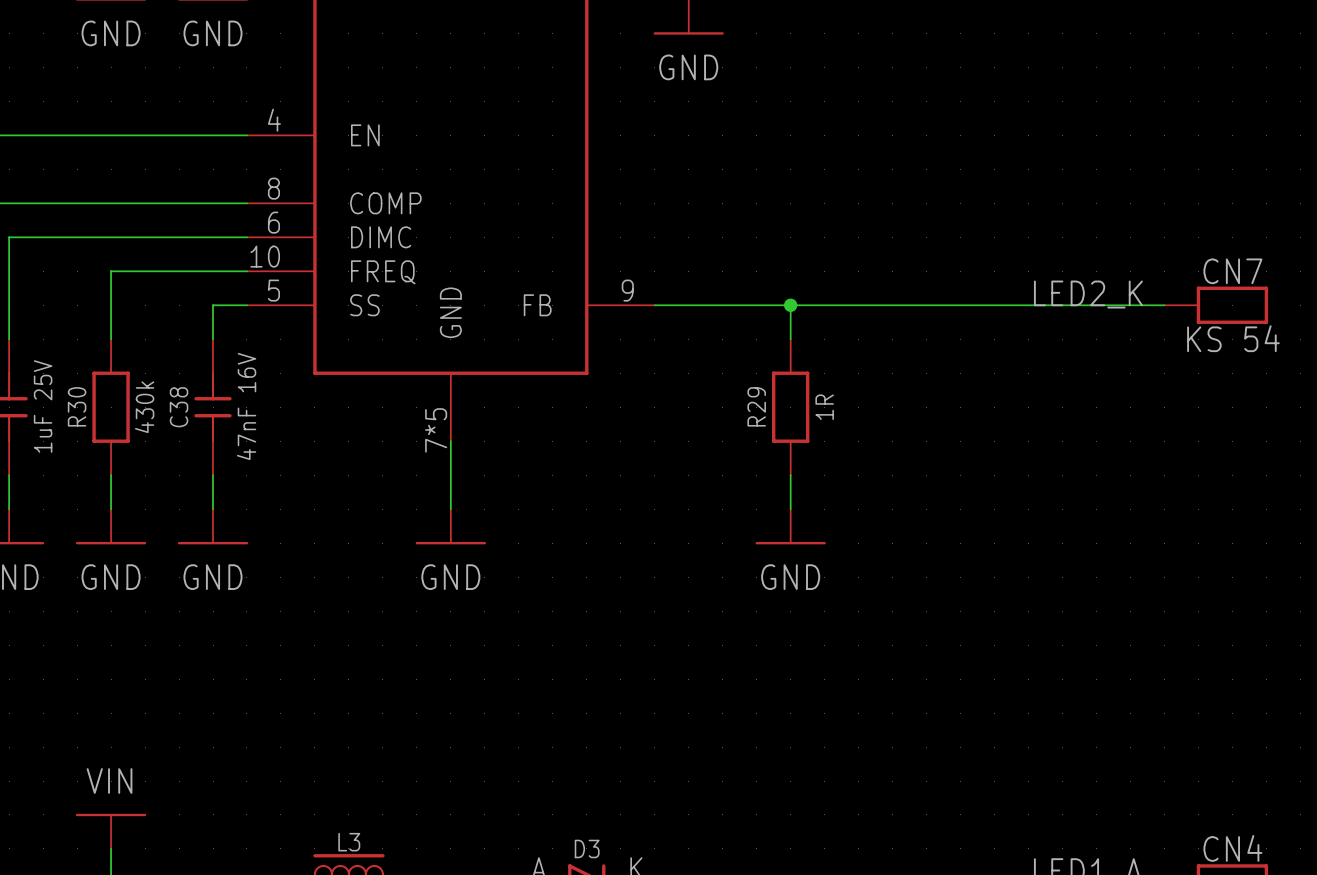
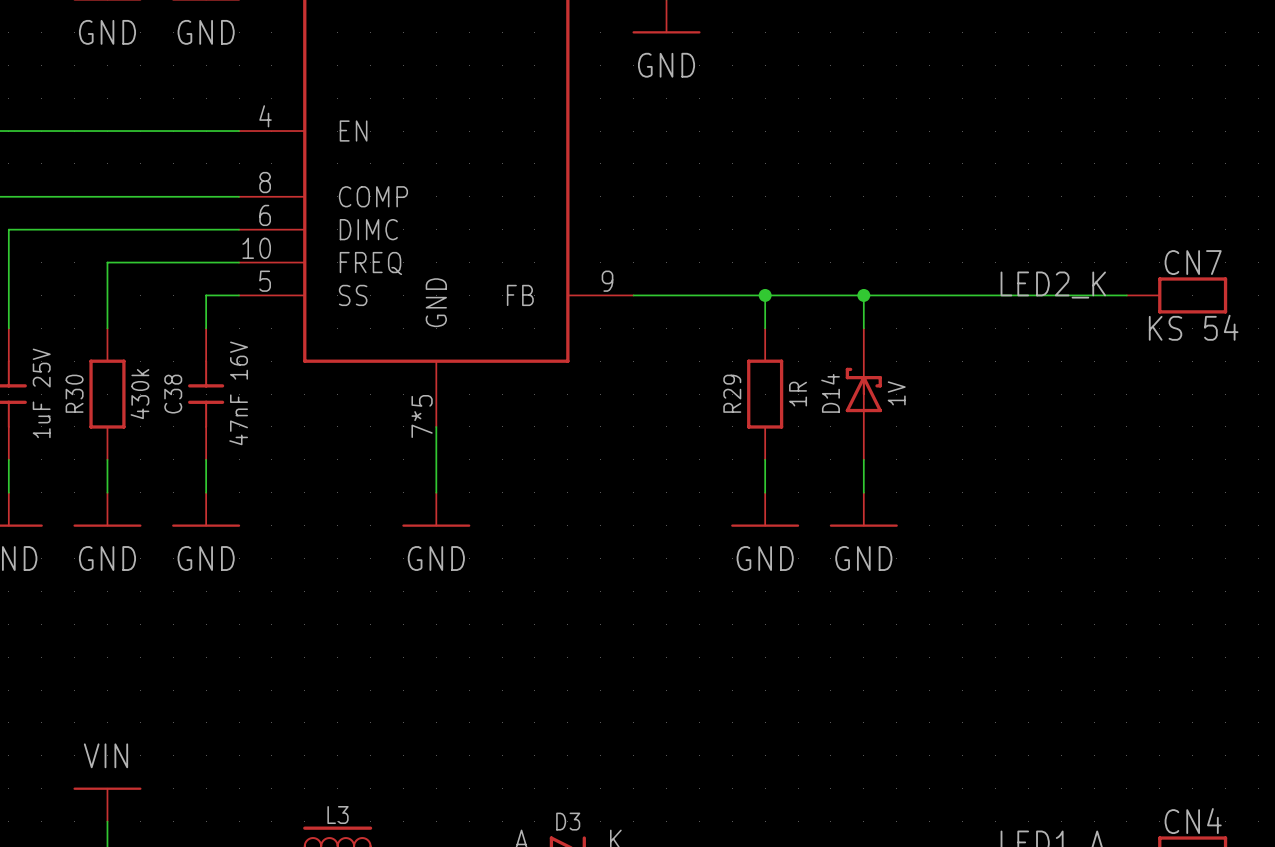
wire: none -> (863, 295) (863, 328)
junction: none -> (863, 295)
D14: none -> 1V (863, 394)
wire: none -> (863, 459) (863, 492)
power symbol: none -> GND (863, 509)

